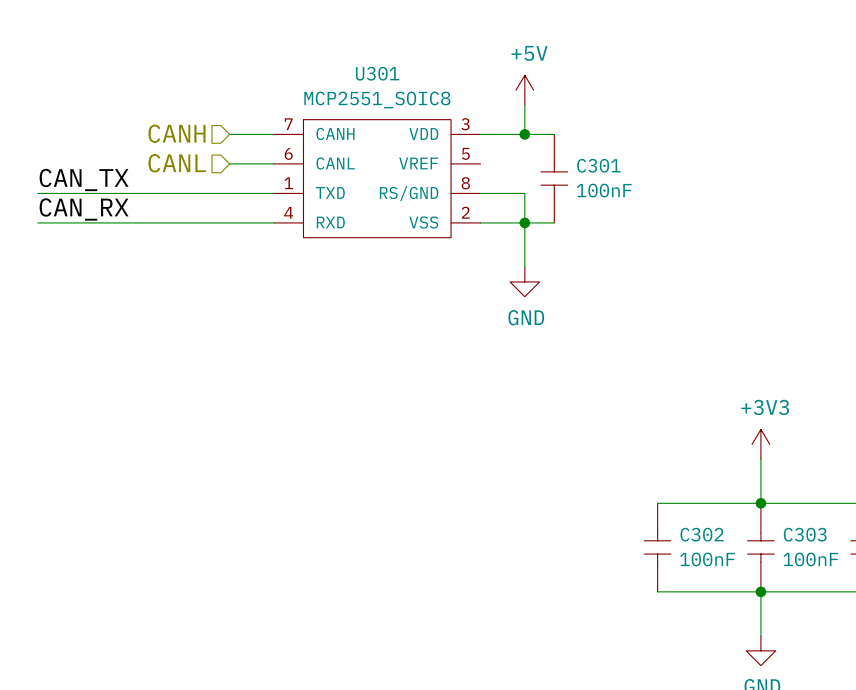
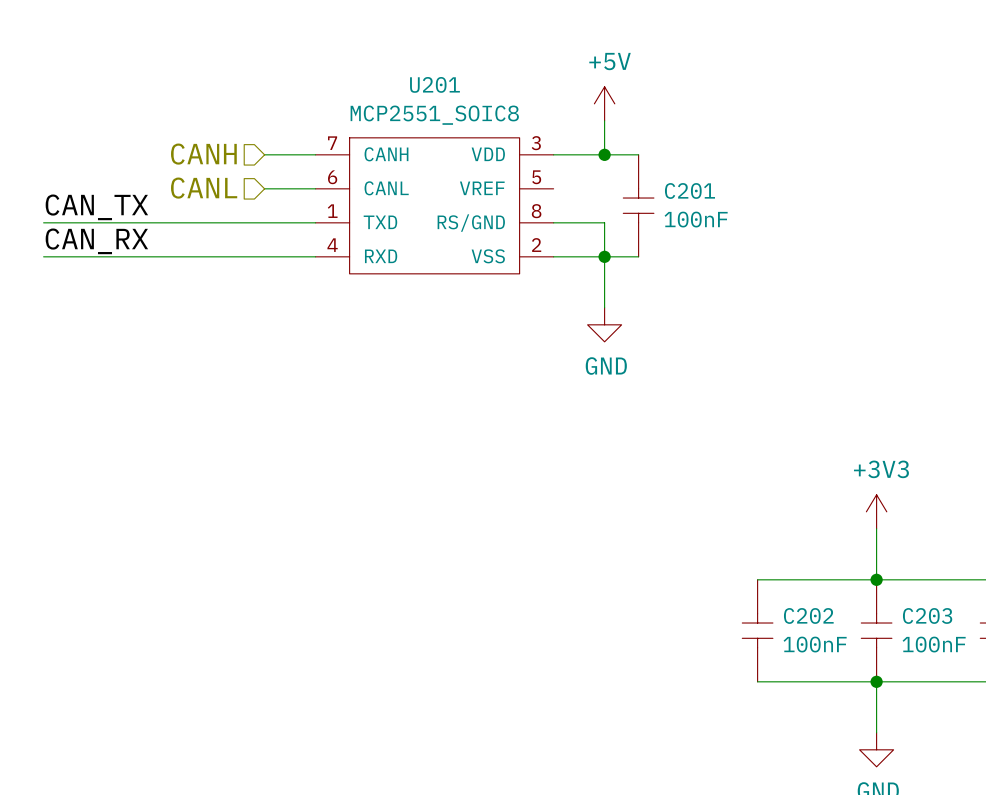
U301 name: U301 (377, 73) -> U201 (434, 84)
C301 name: C301 (598, 165) -> C201 (689, 190)
C302 name: C302 (702, 534) -> C202 (808, 615)
C303 name: C303 (805, 534) -> C203 (927, 615)

